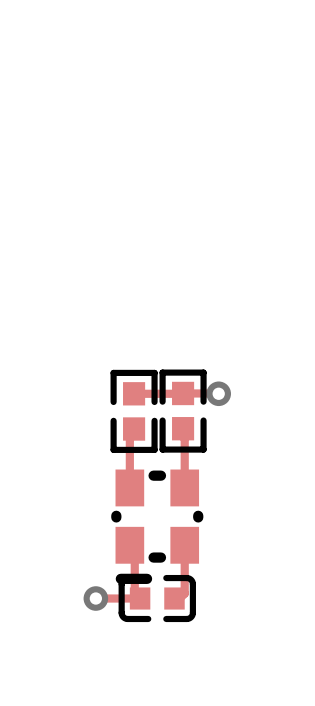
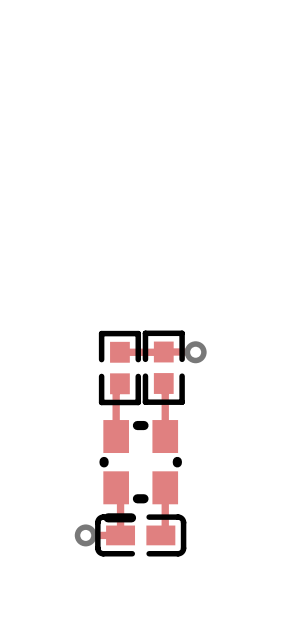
part footprint: [118, 574, 196, 623] -> [95, 514, 187, 557]

